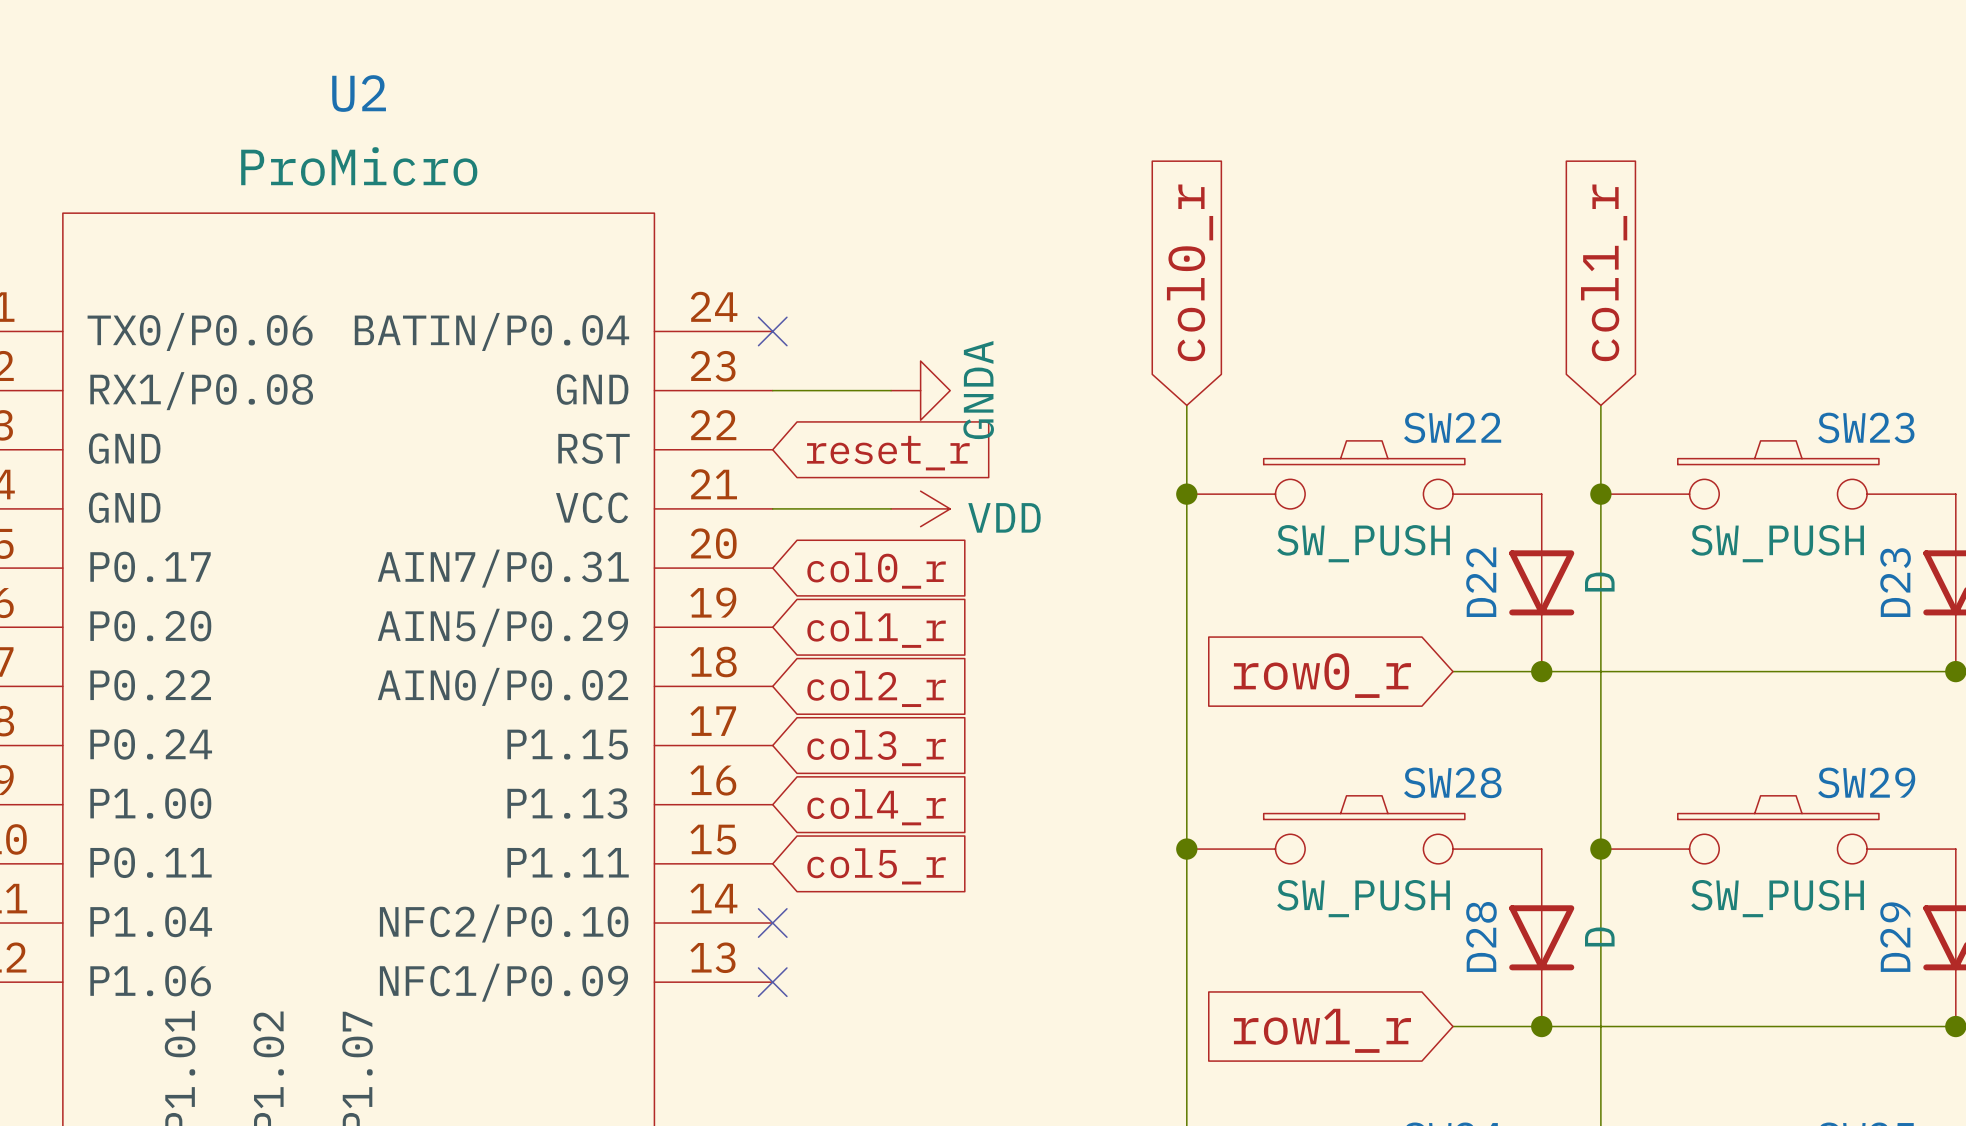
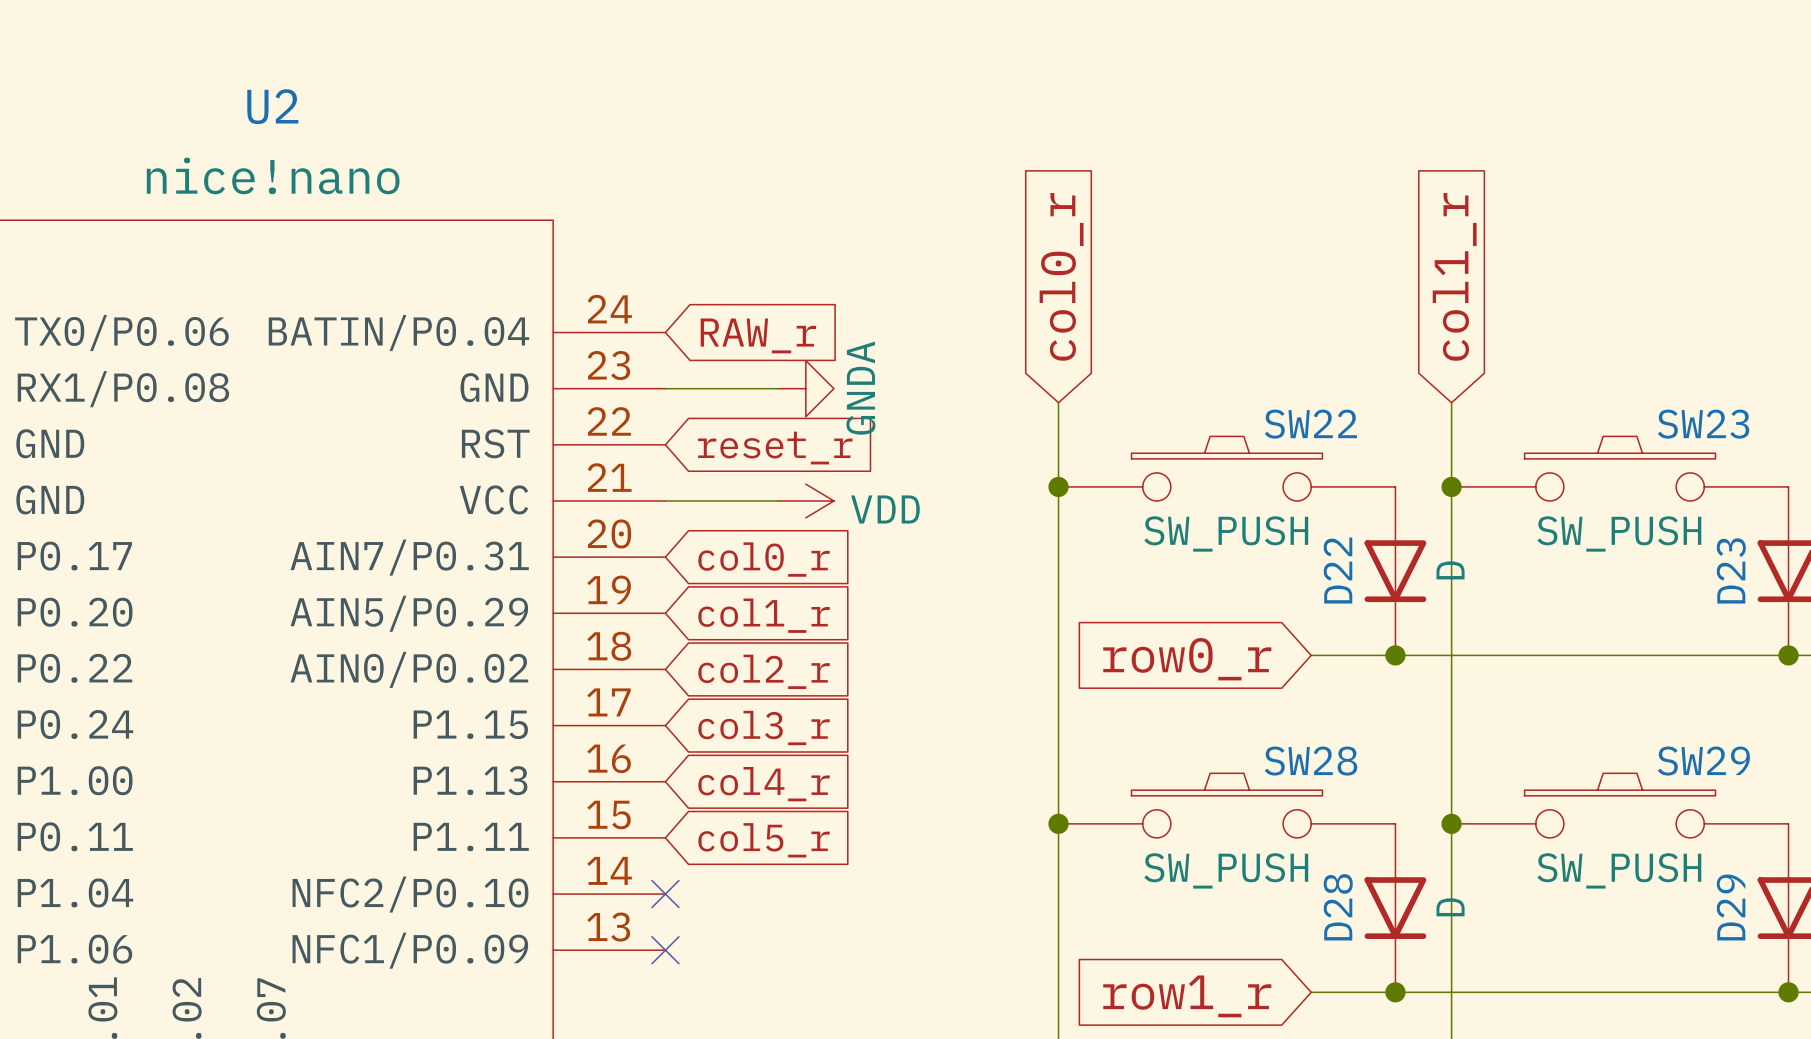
U2 value: ProMicro (359, 166) -> nice!nano (273, 175)
no-connect mark: (772, 331) -> none
global label: none -> RAW_r (758, 335)

